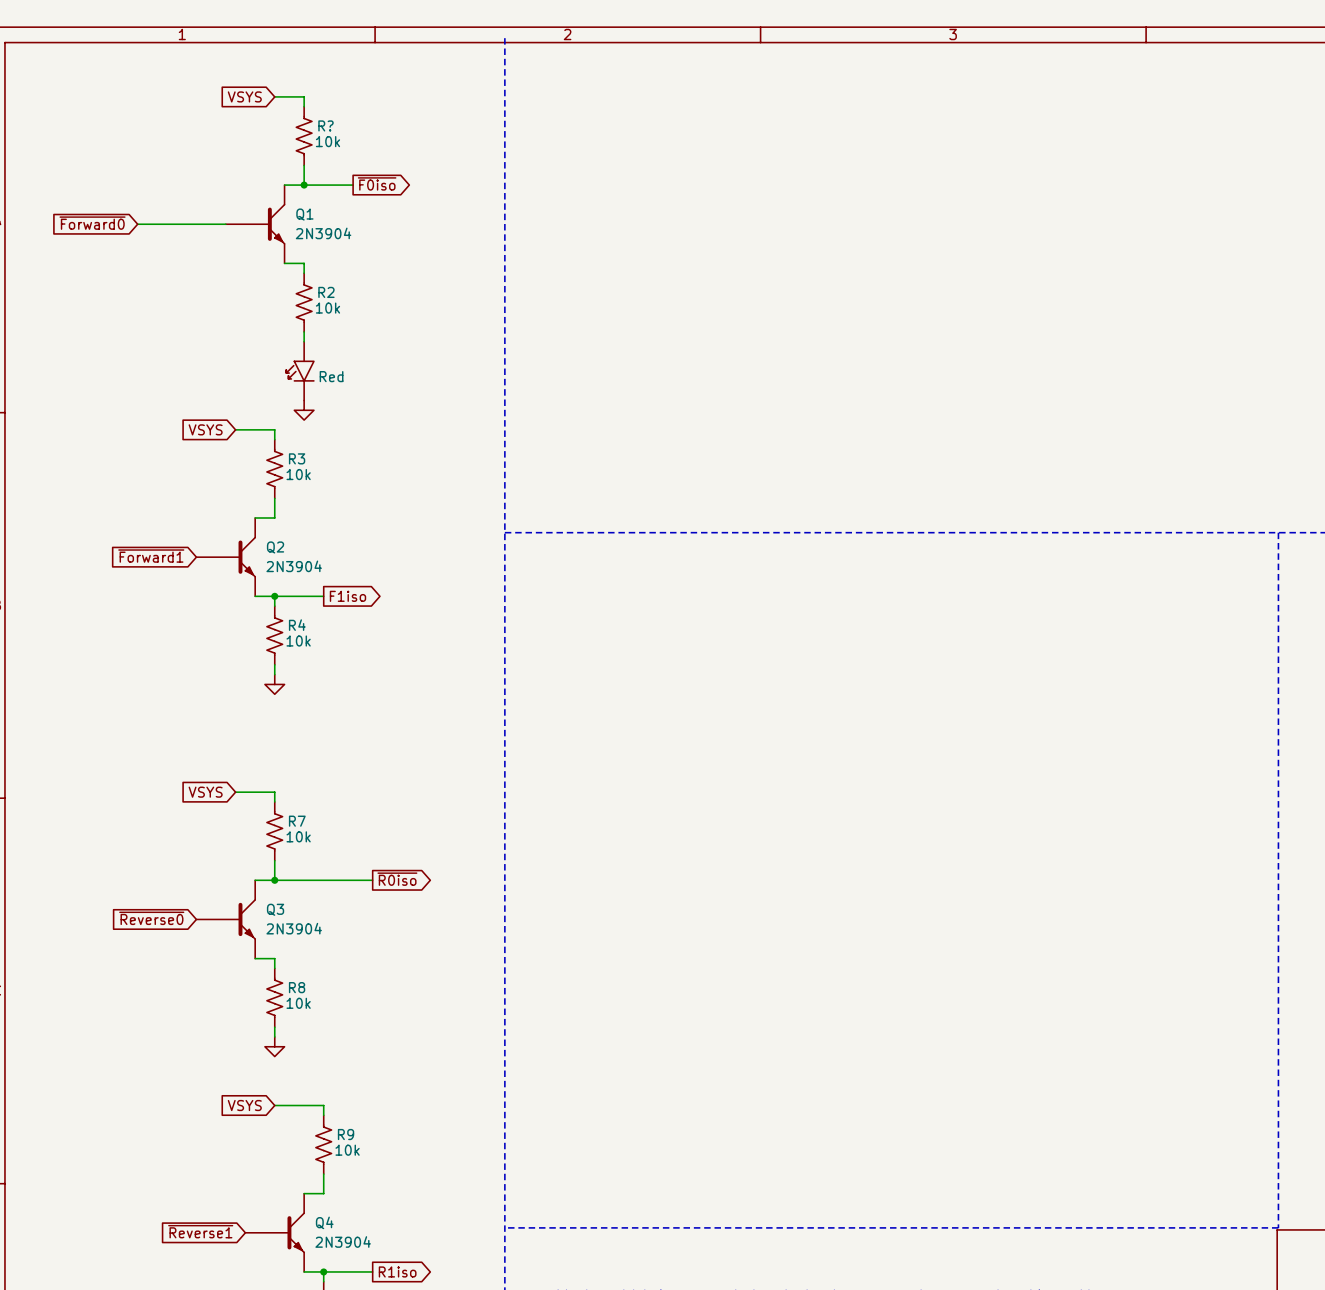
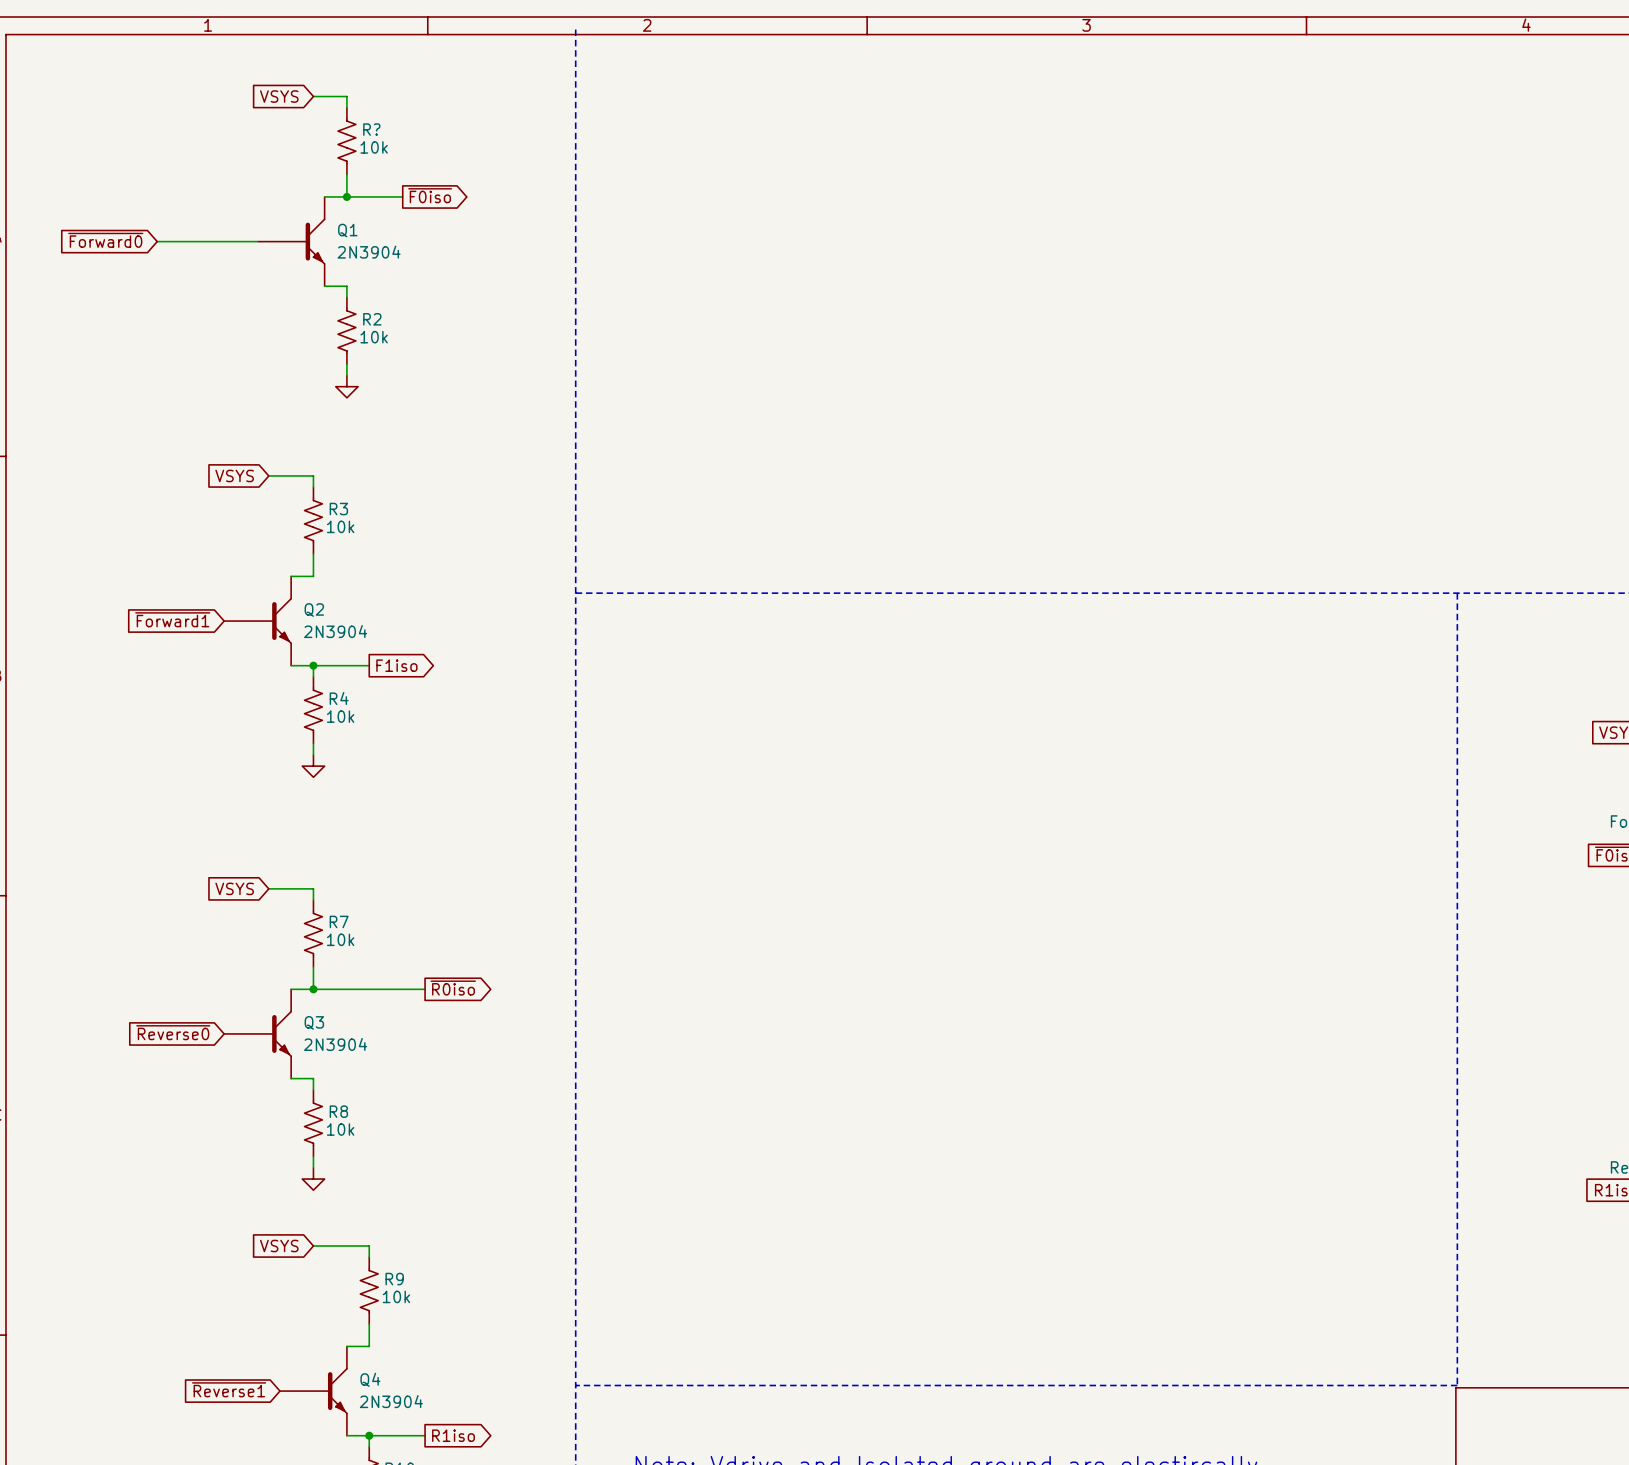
part: Red (300, 371) -> none
power symbol position: (304, 410) -> (346, 386)

